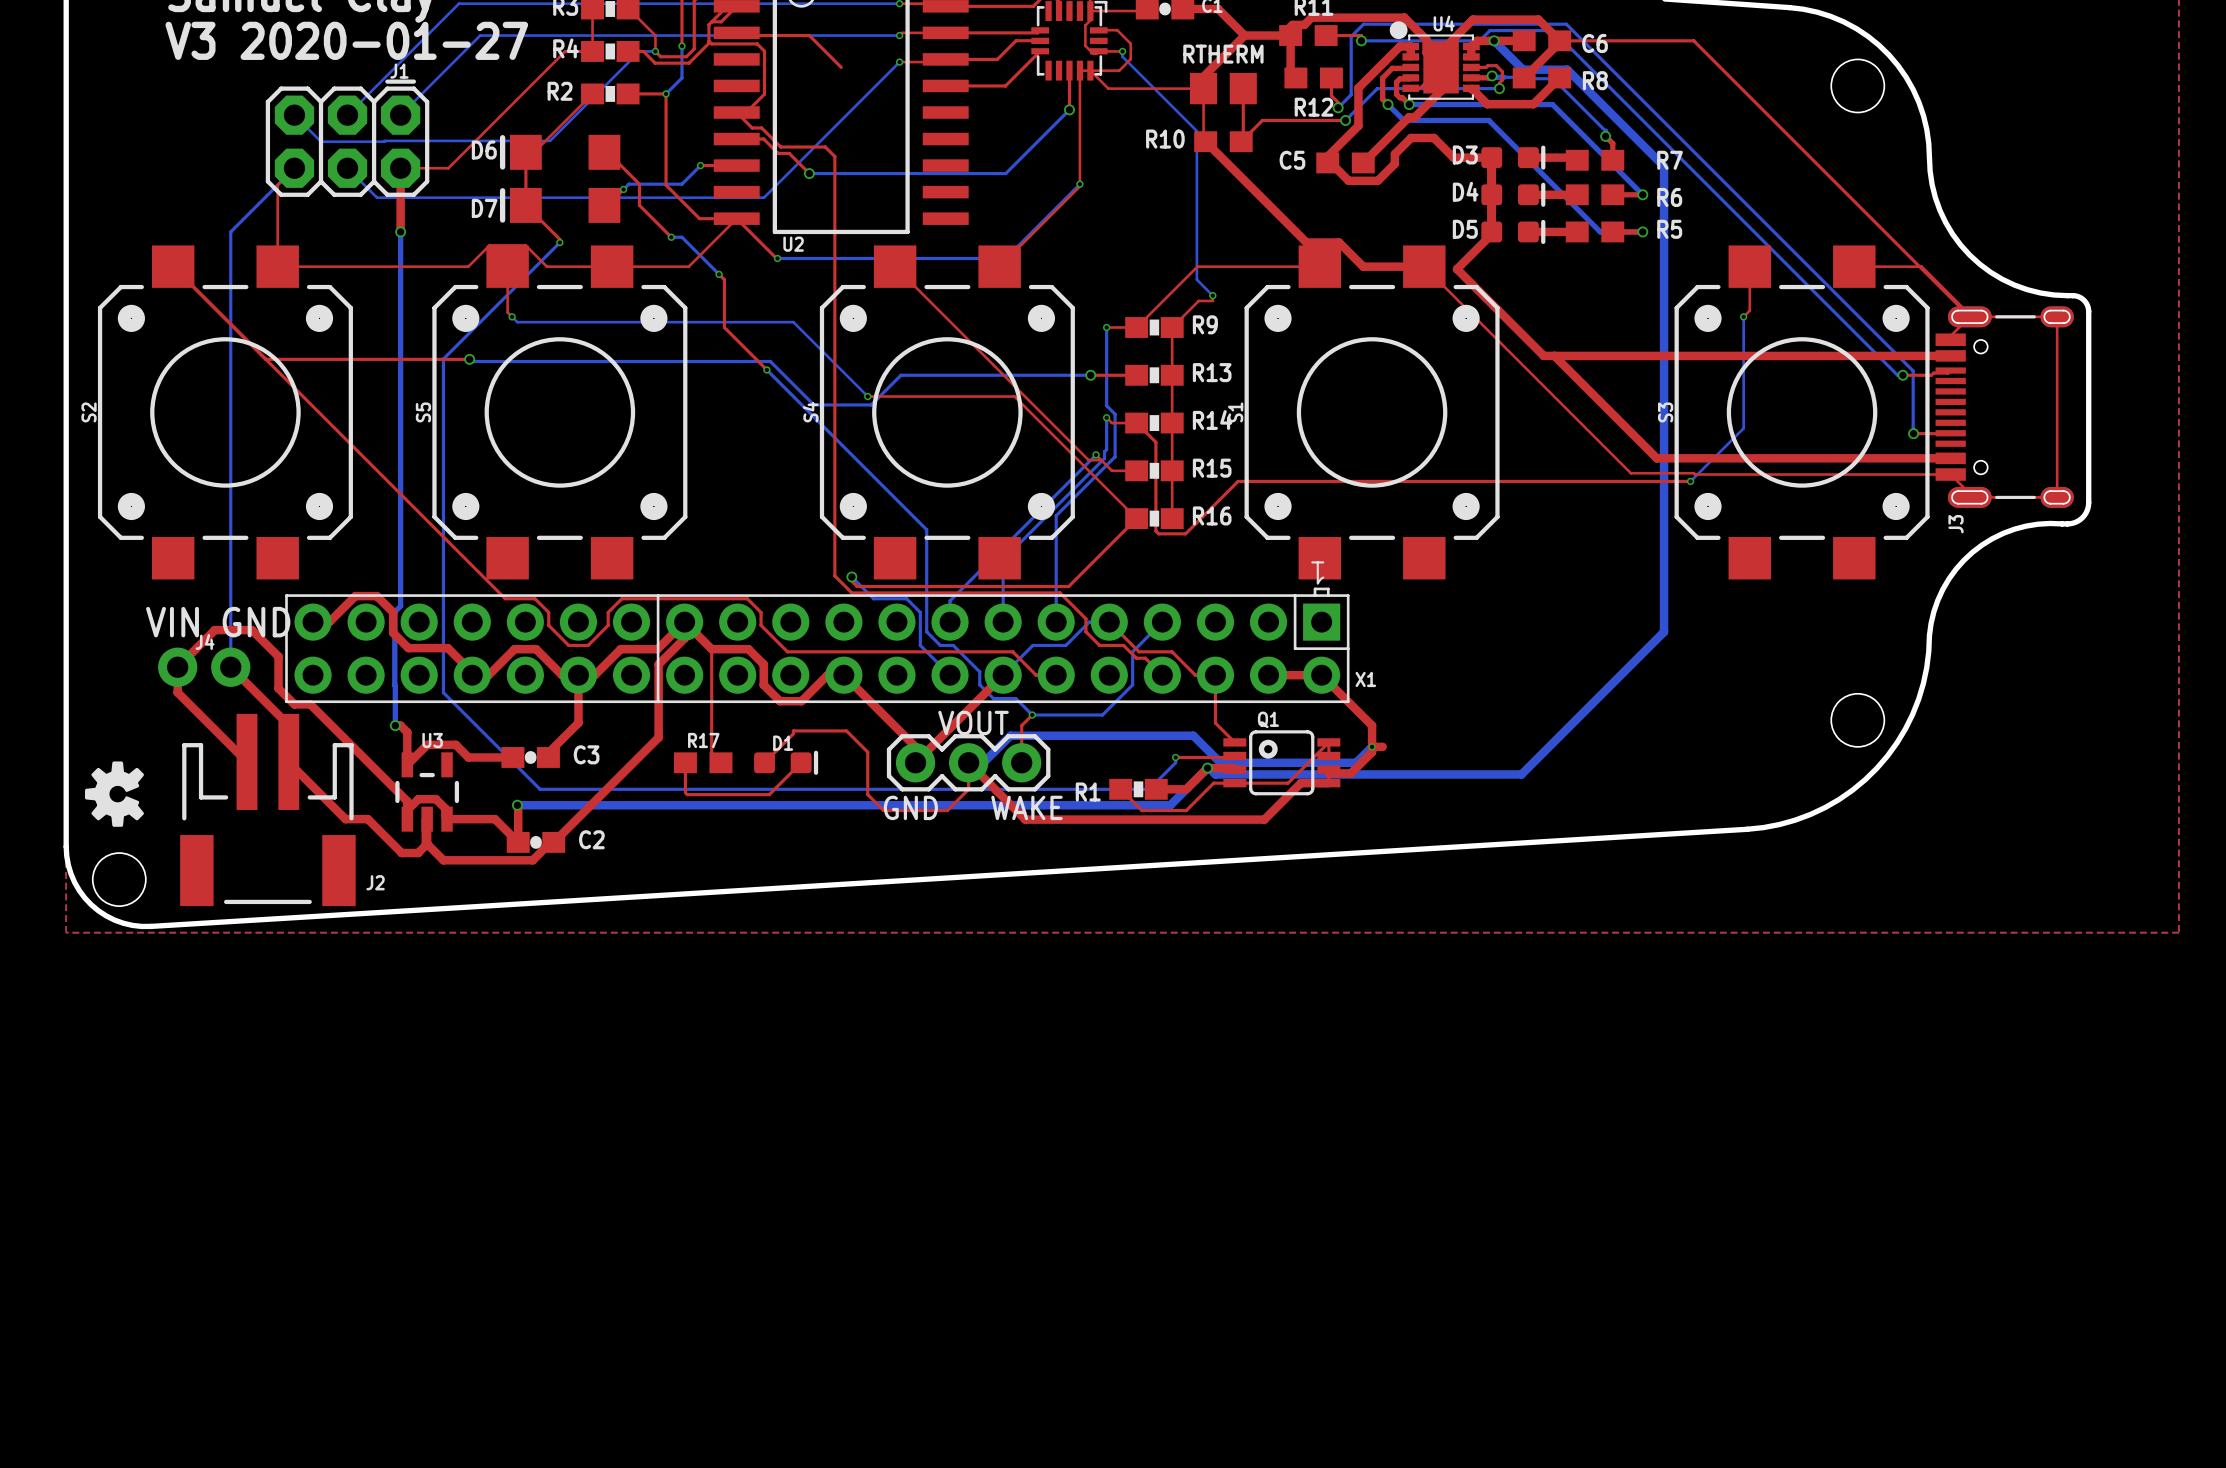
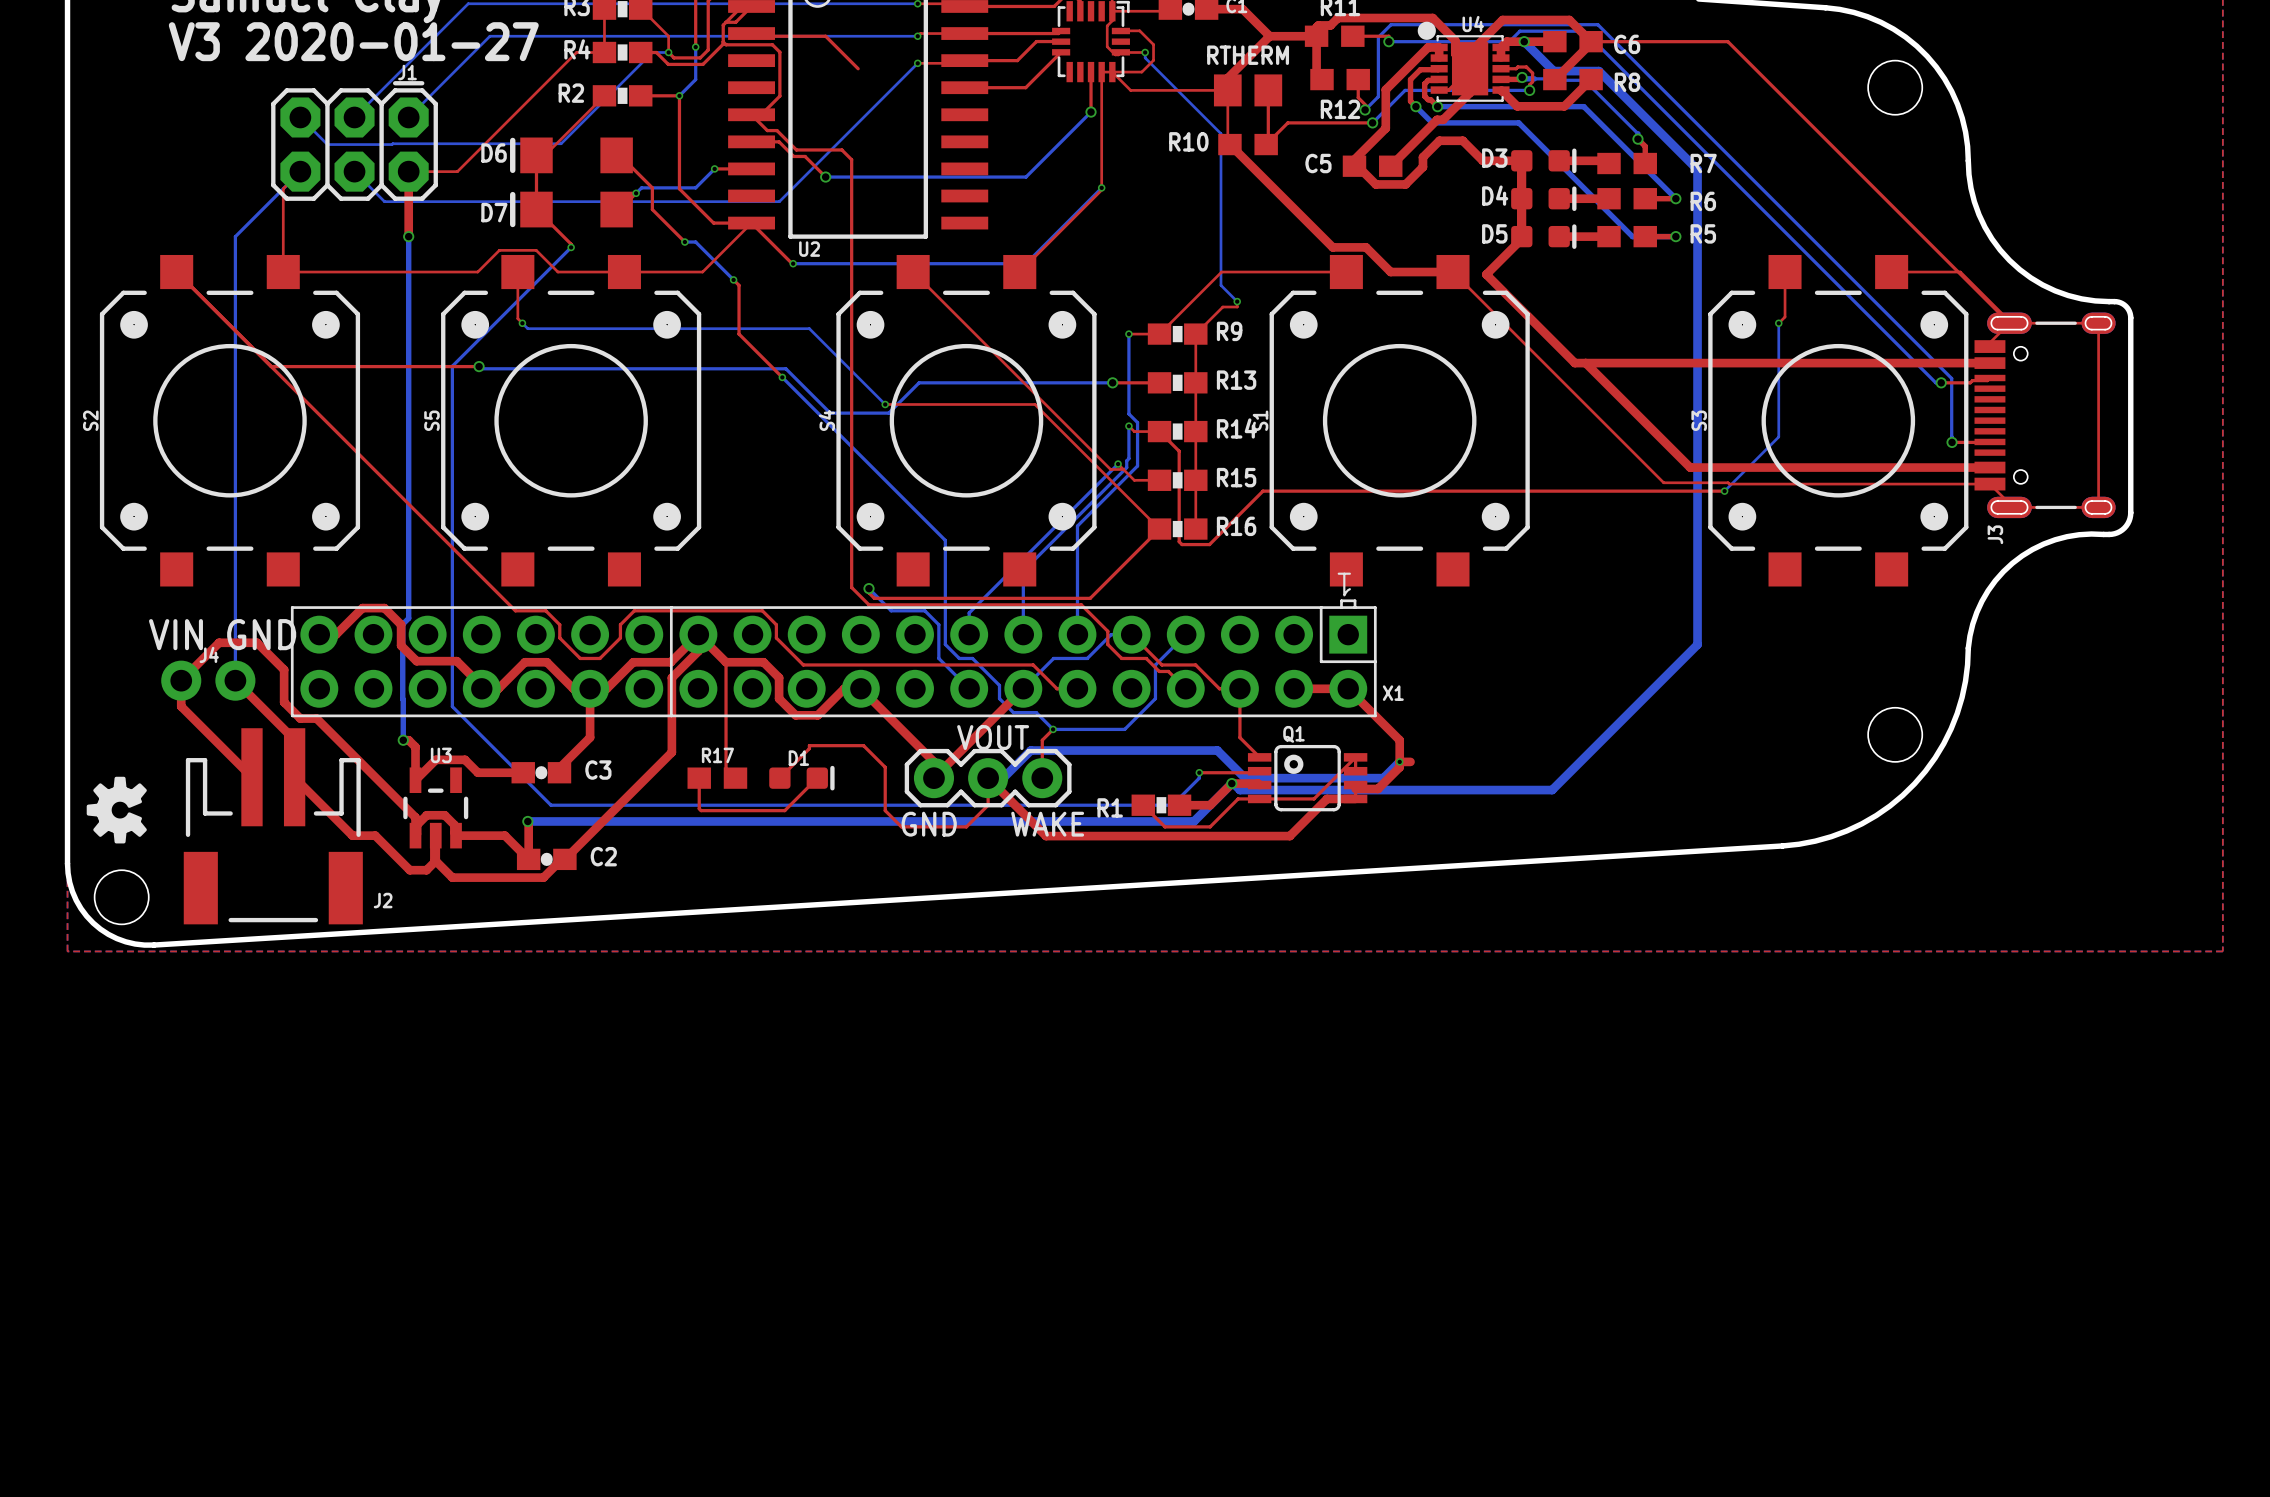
S2 footprint: [97, 245, 353, 580] -> [99, 254, 361, 587]
S5 footprint: [432, 245, 688, 580] -> [441, 254, 702, 587]
S4 footprint: [819, 245, 1075, 580] -> [836, 254, 1097, 587]
S1 footprint: [1244, 245, 1500, 580] -> [1269, 254, 1530, 587]
S3 footprint: [1674, 245, 1930, 580] -> [1708, 254, 1969, 587]

